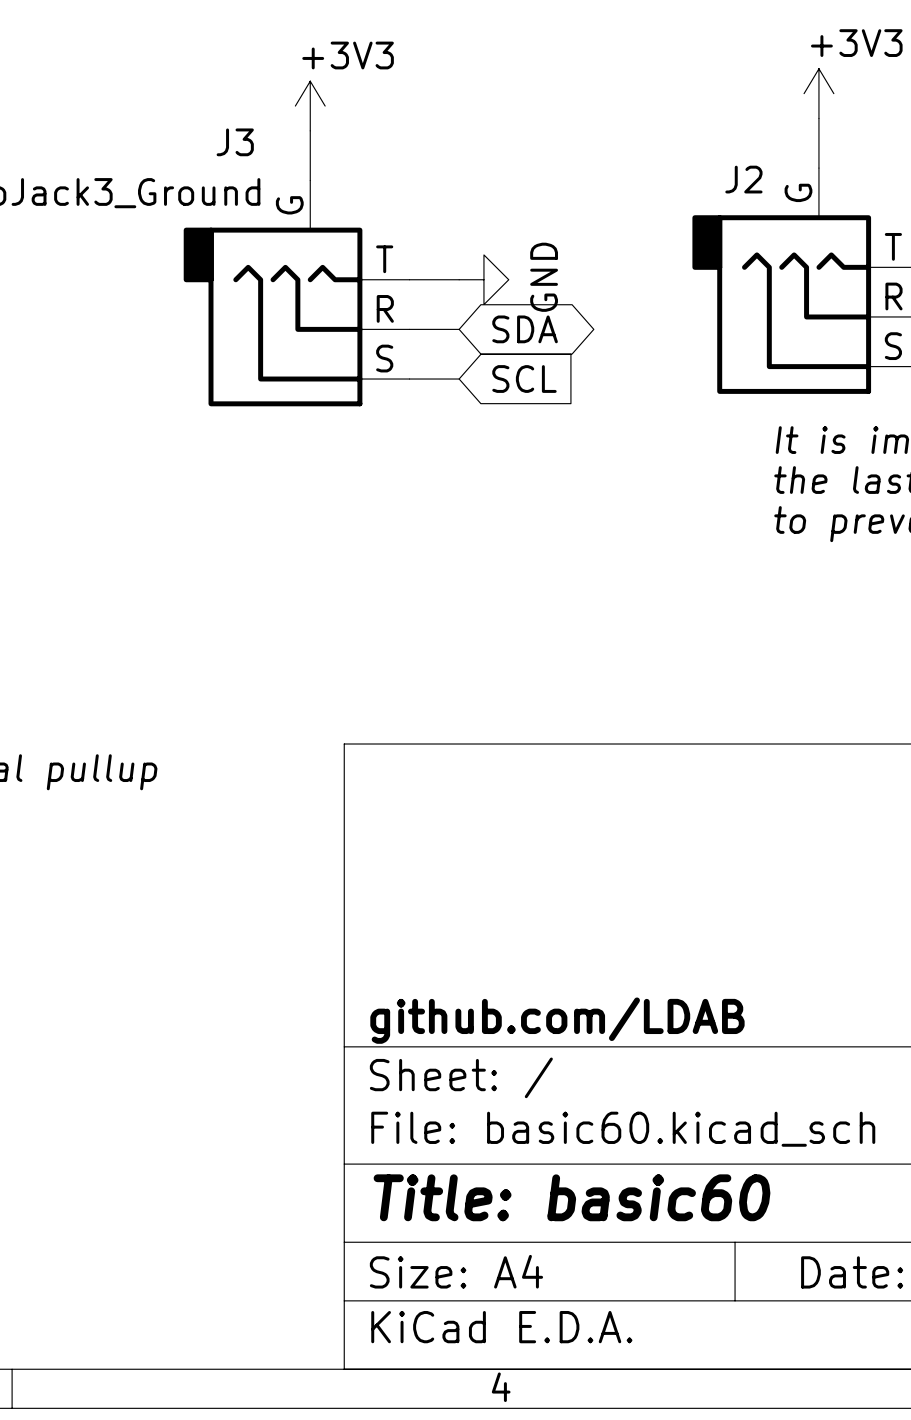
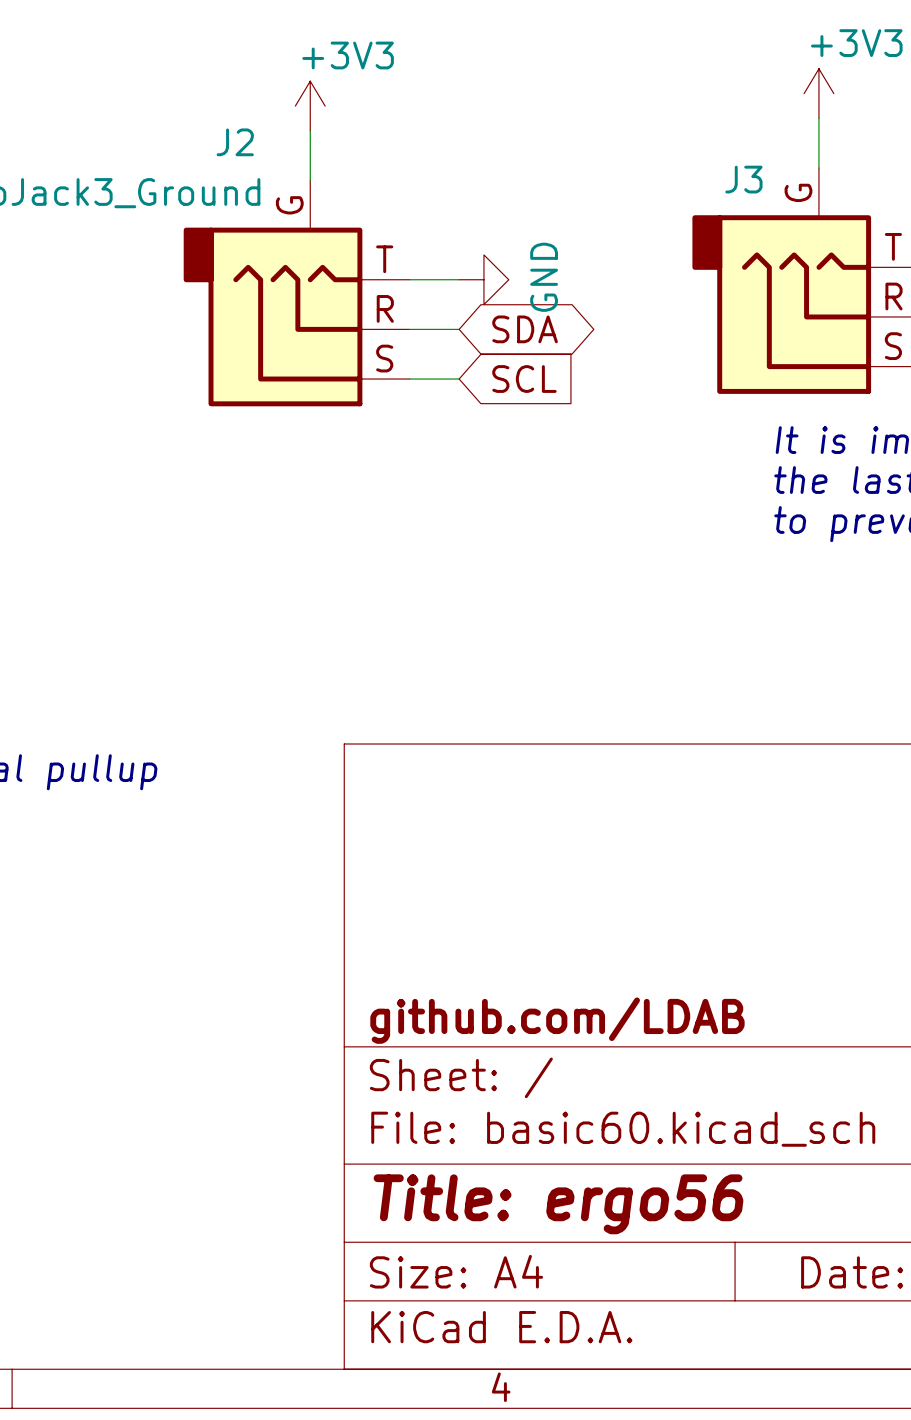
J3 name: J3 (235, 142) -> J2 (235, 142)
J2 name: J2 (743, 179) -> J3 (743, 179)
title block: Title: basic60 (572, 1197) -> Title: ergo56 (558, 1204)

